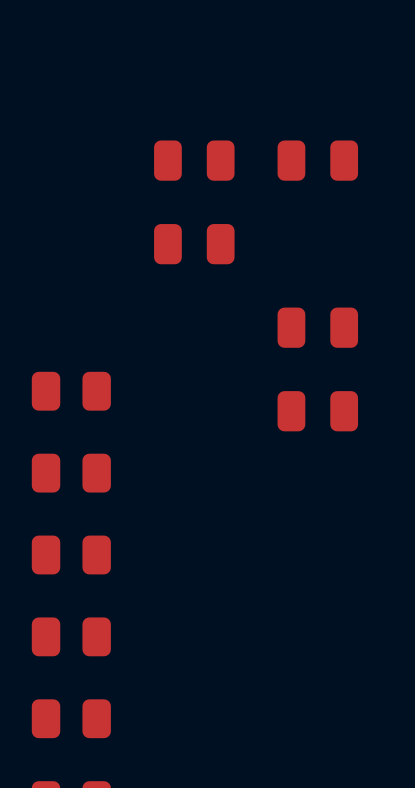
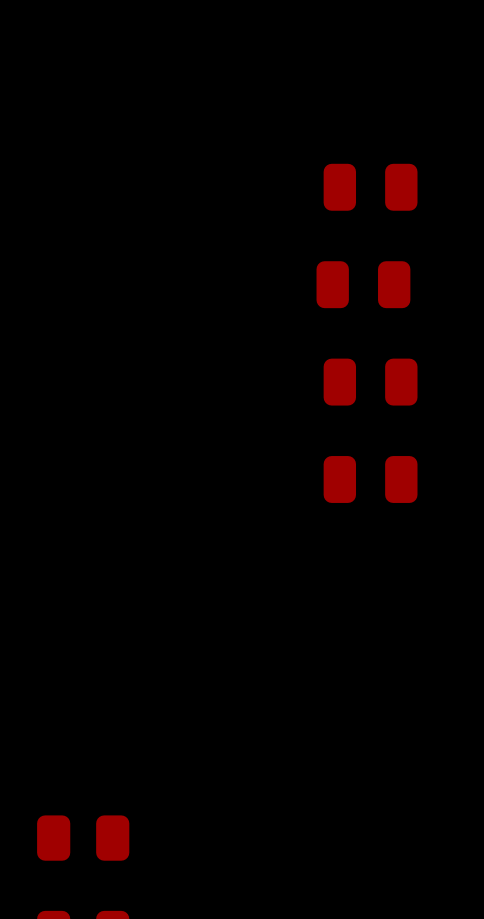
part: (194, 160) -> none
part: (194, 244) -> none
part: none -> (363, 284)
part: (71, 391) -> none
part: (71, 473) -> none
part: (71, 554) -> none
part: (71, 636) -> none

